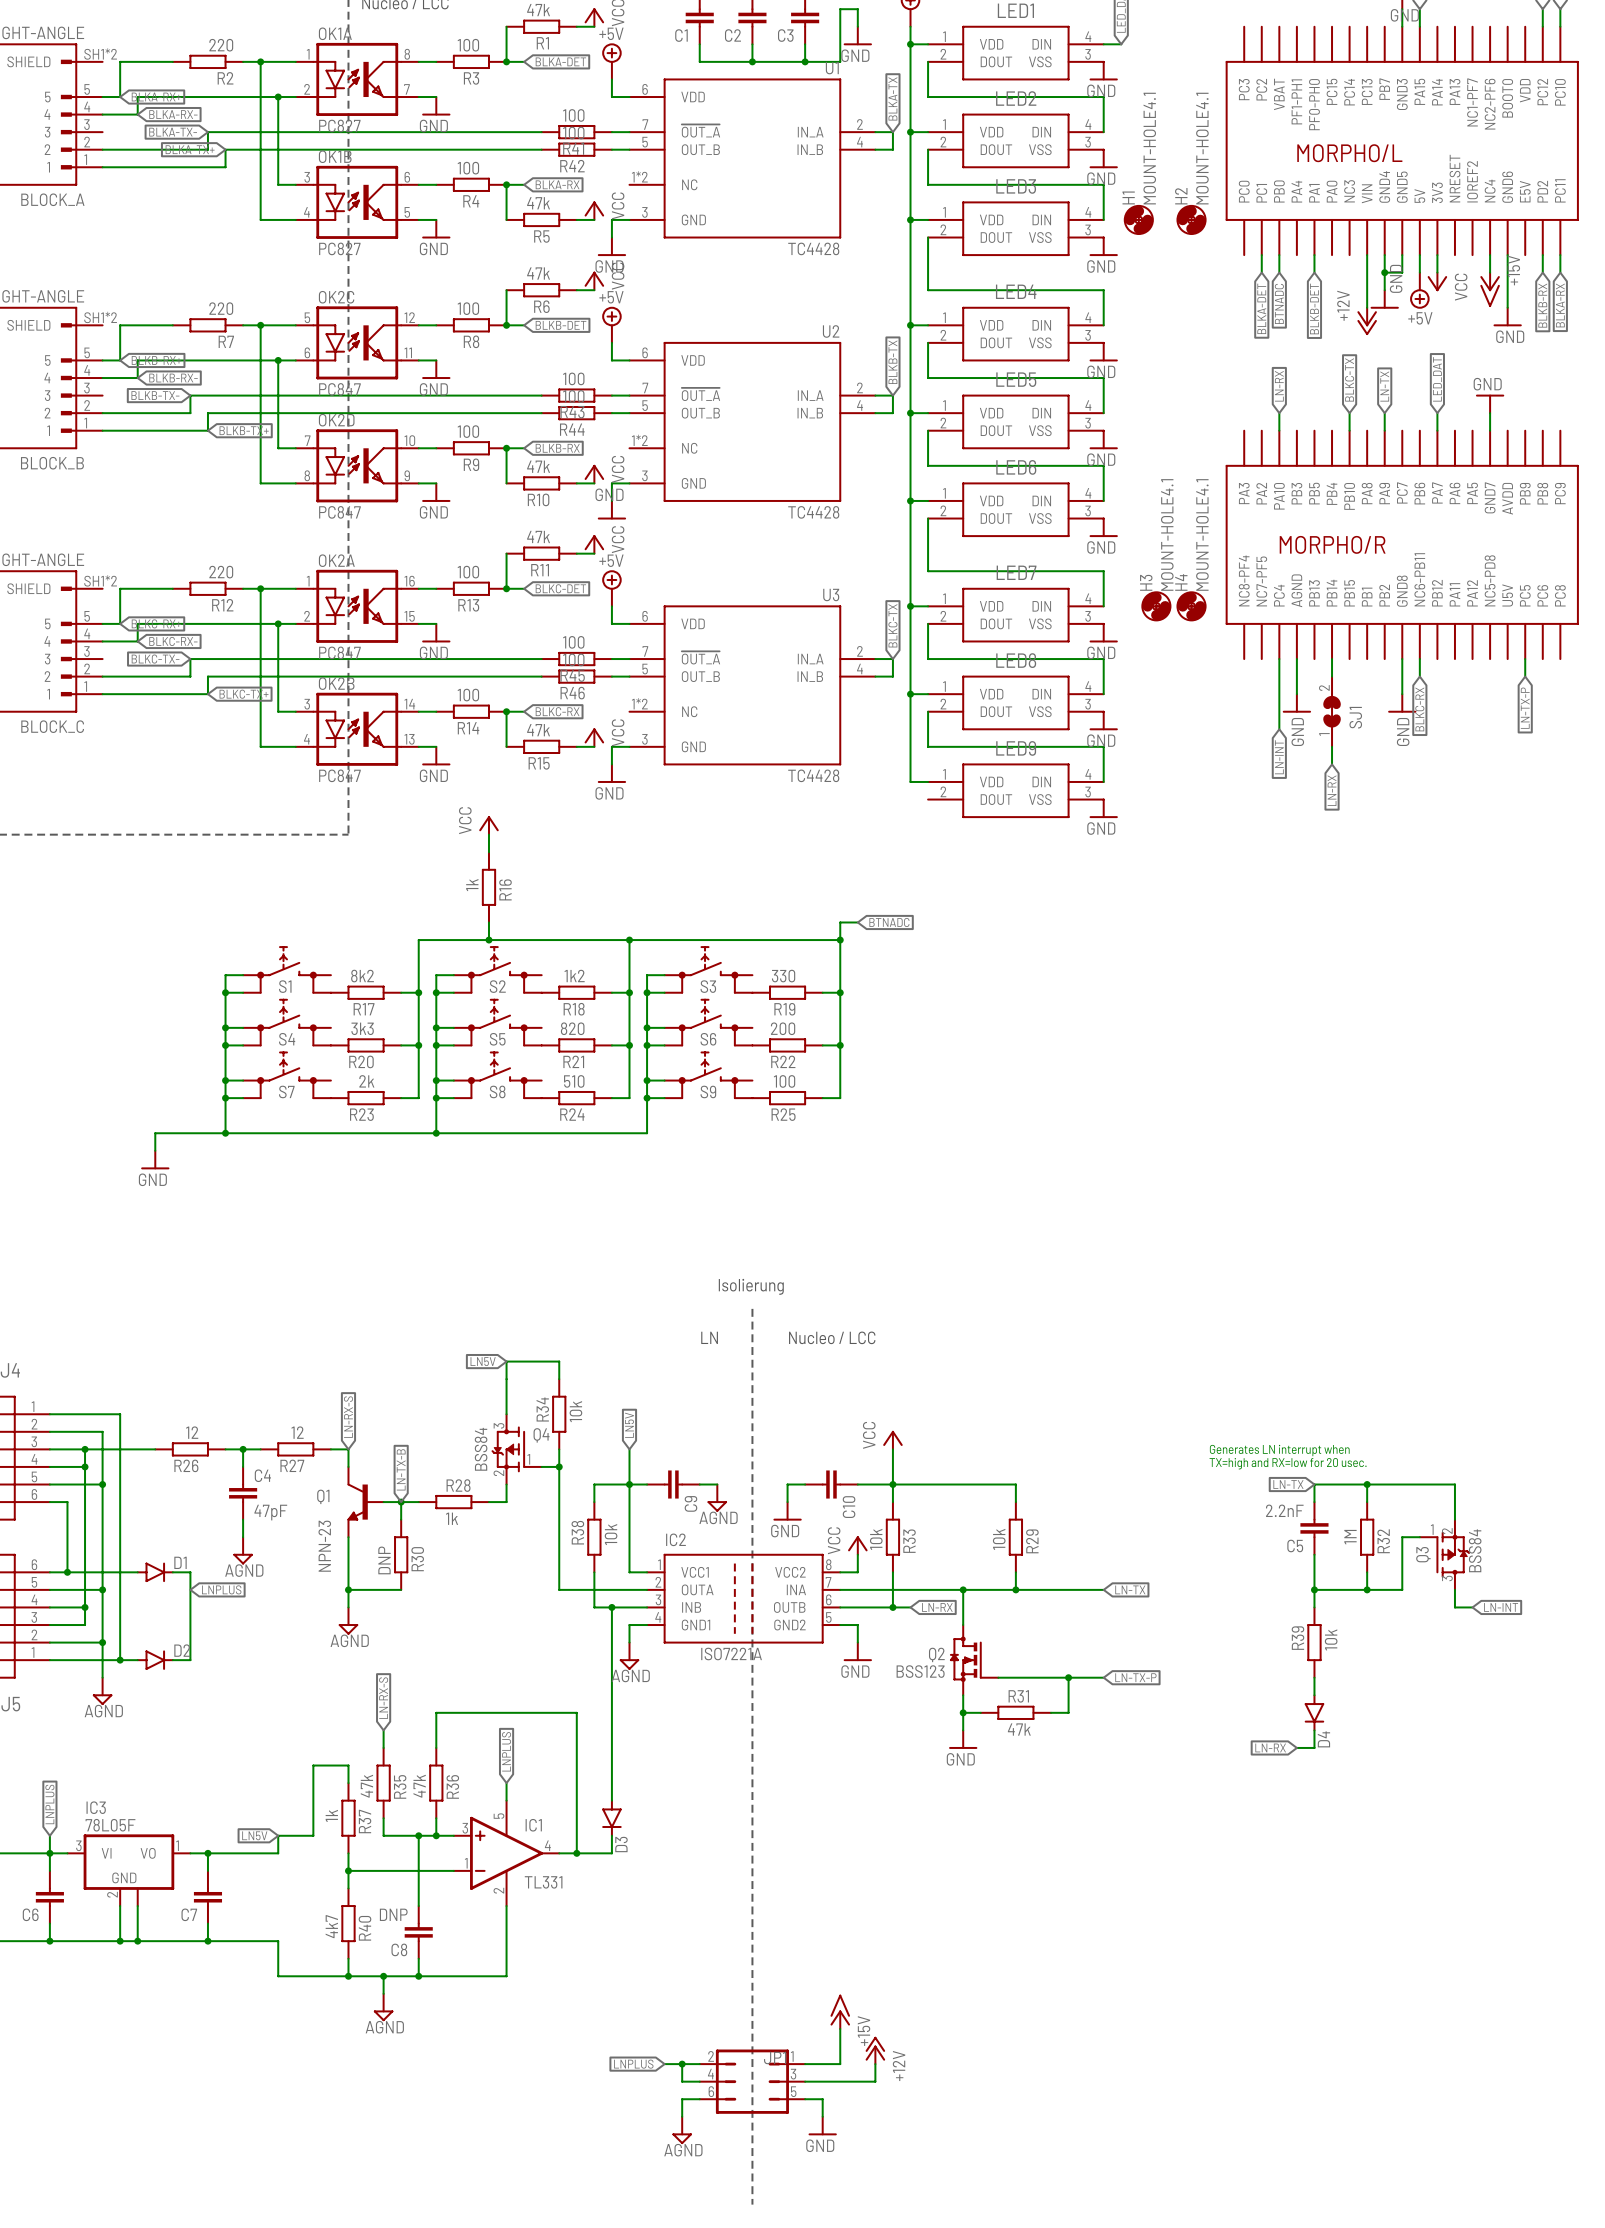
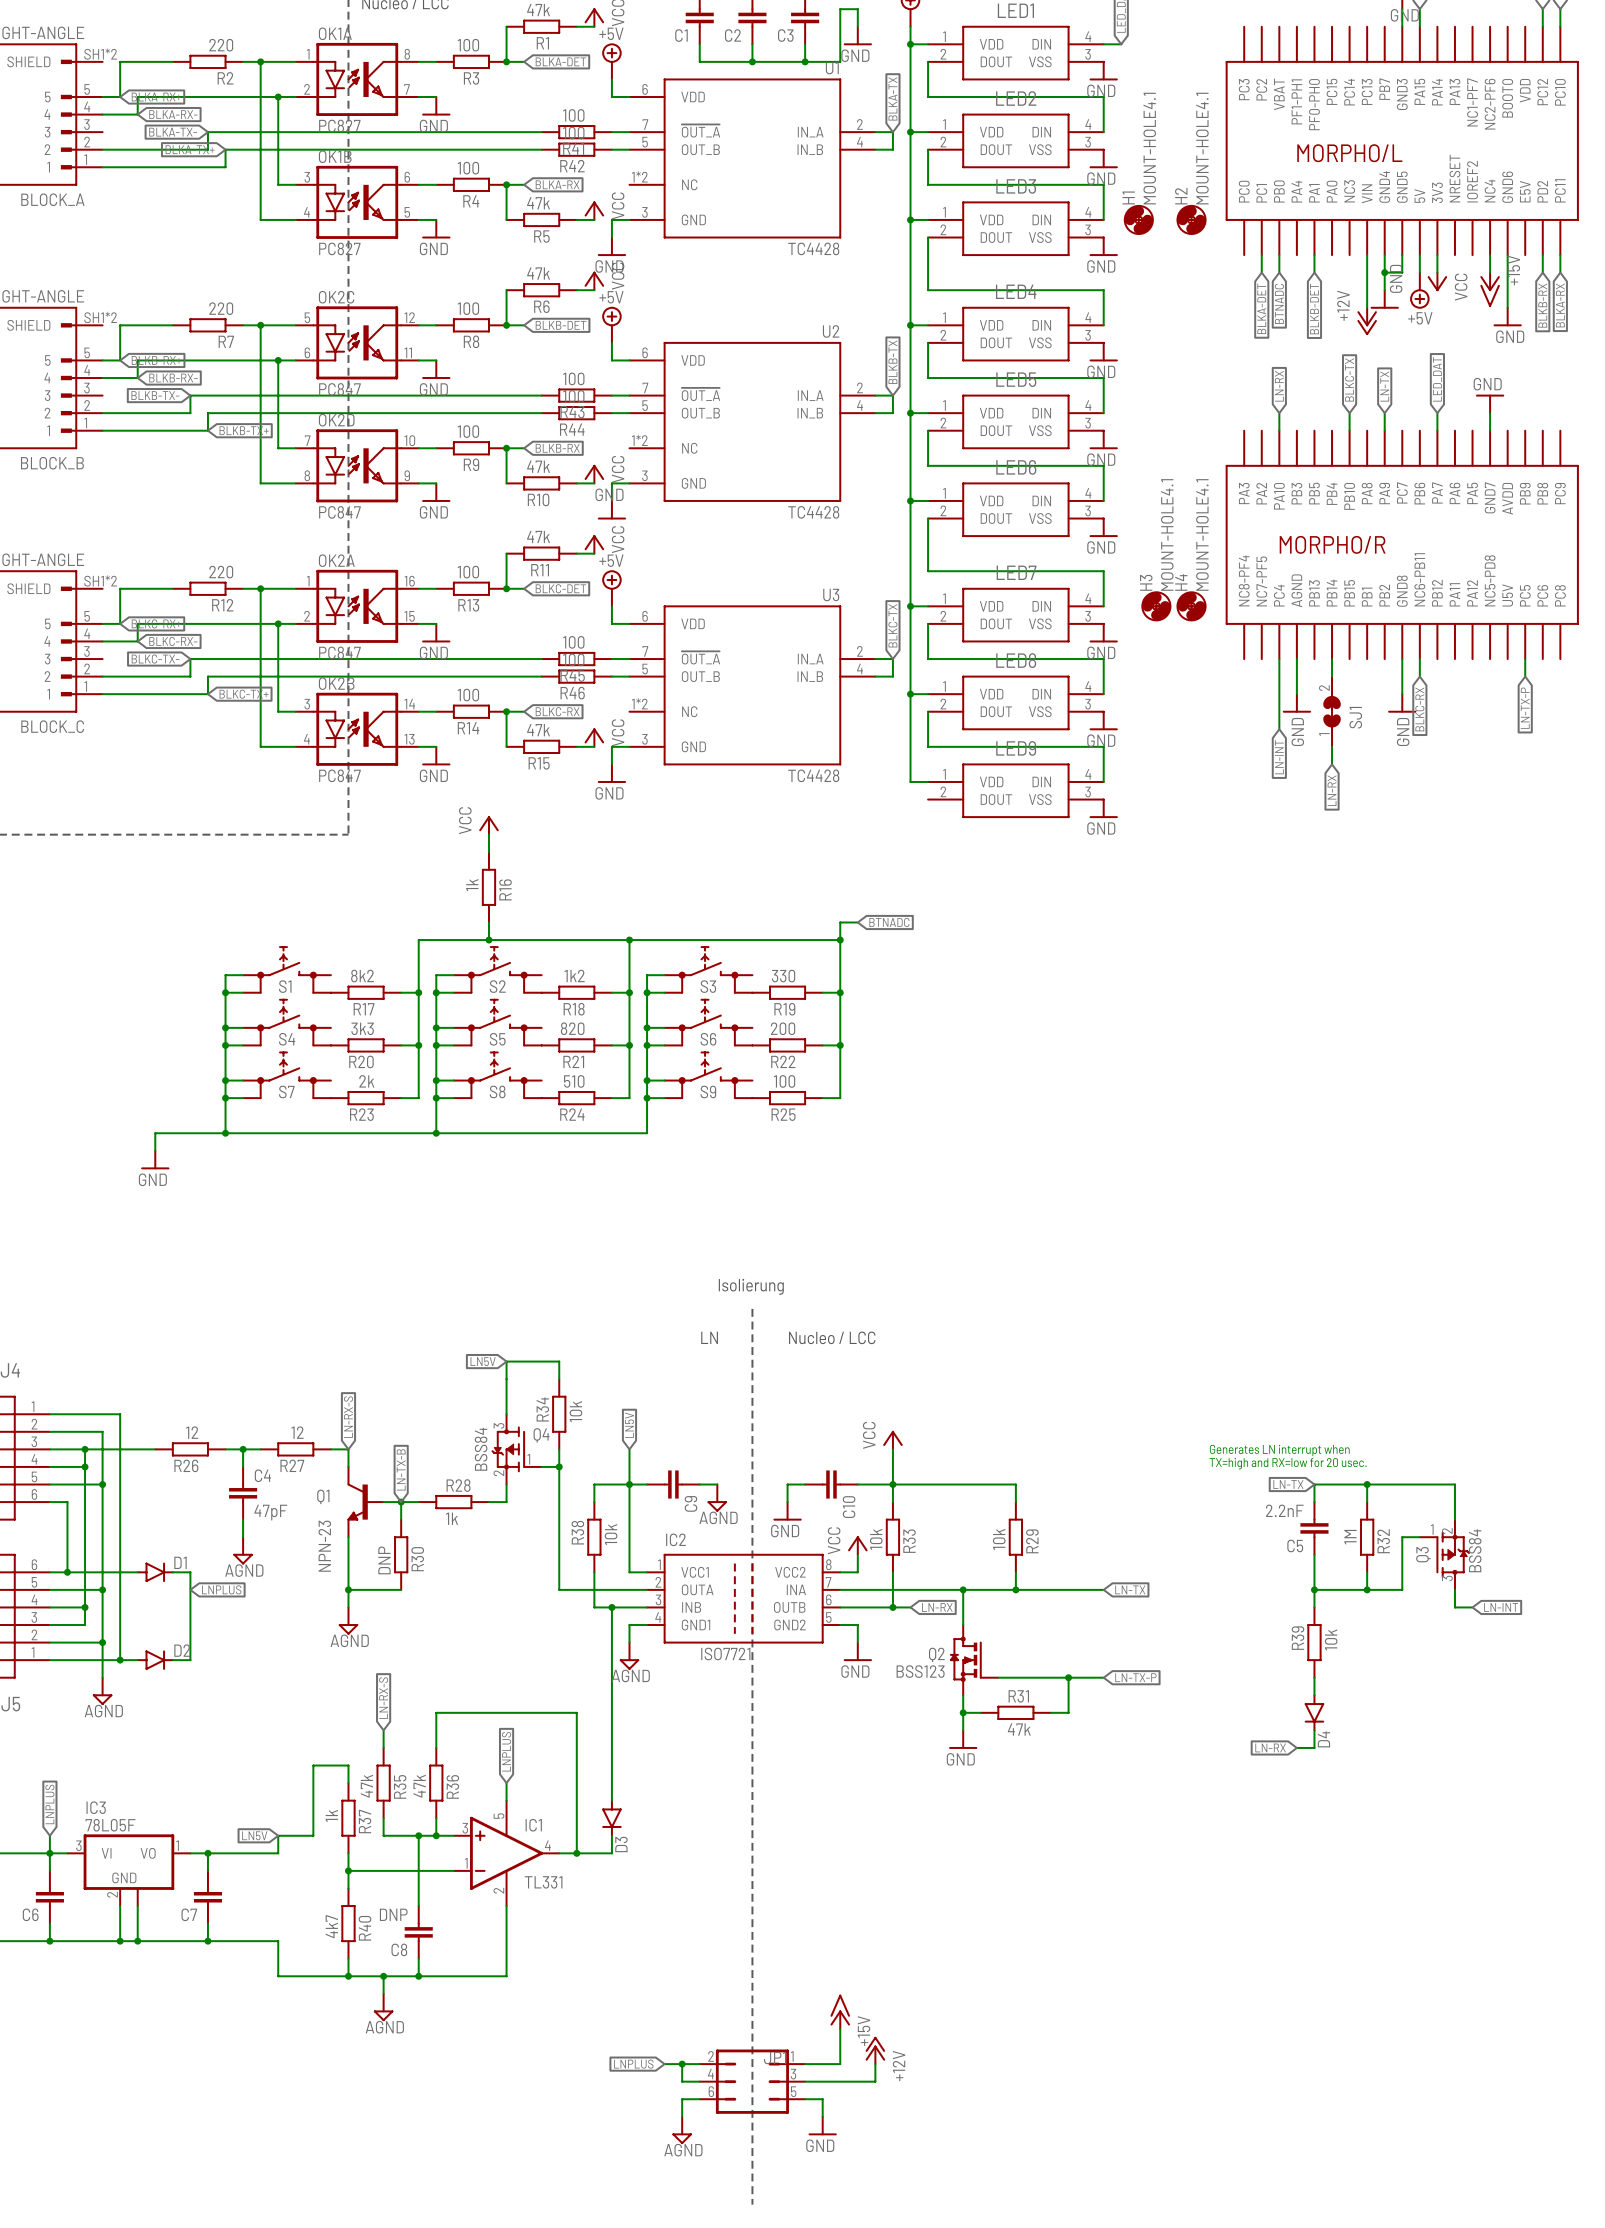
IC2 value: ISO7221A (731, 1654) -> ISO7721 (725, 1654)

